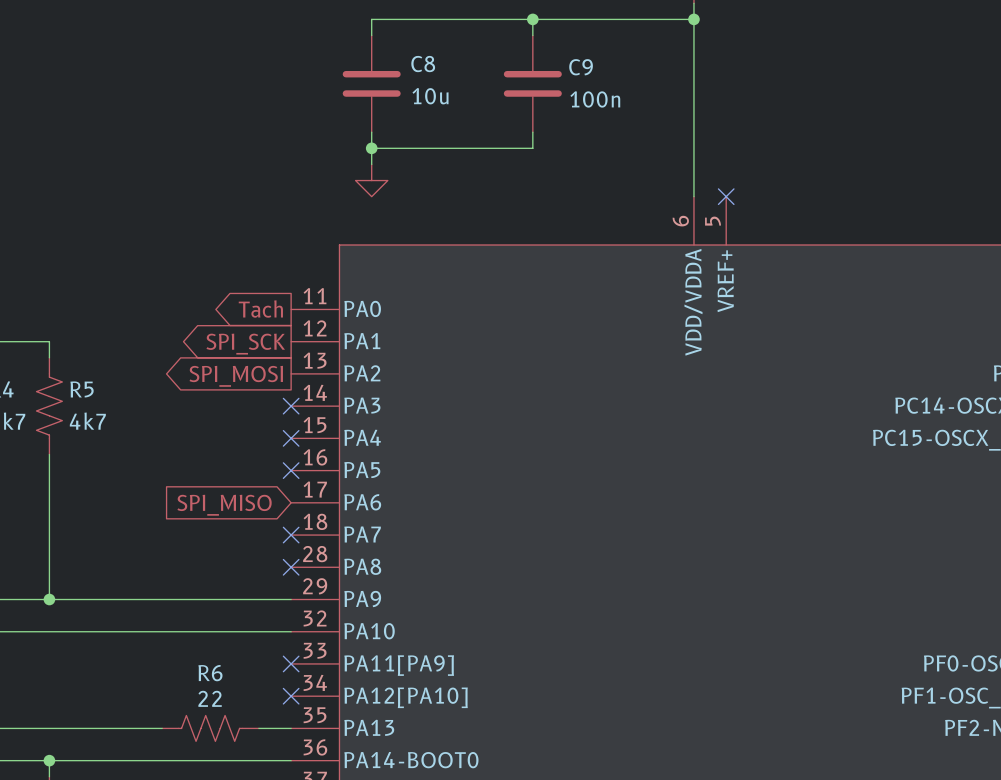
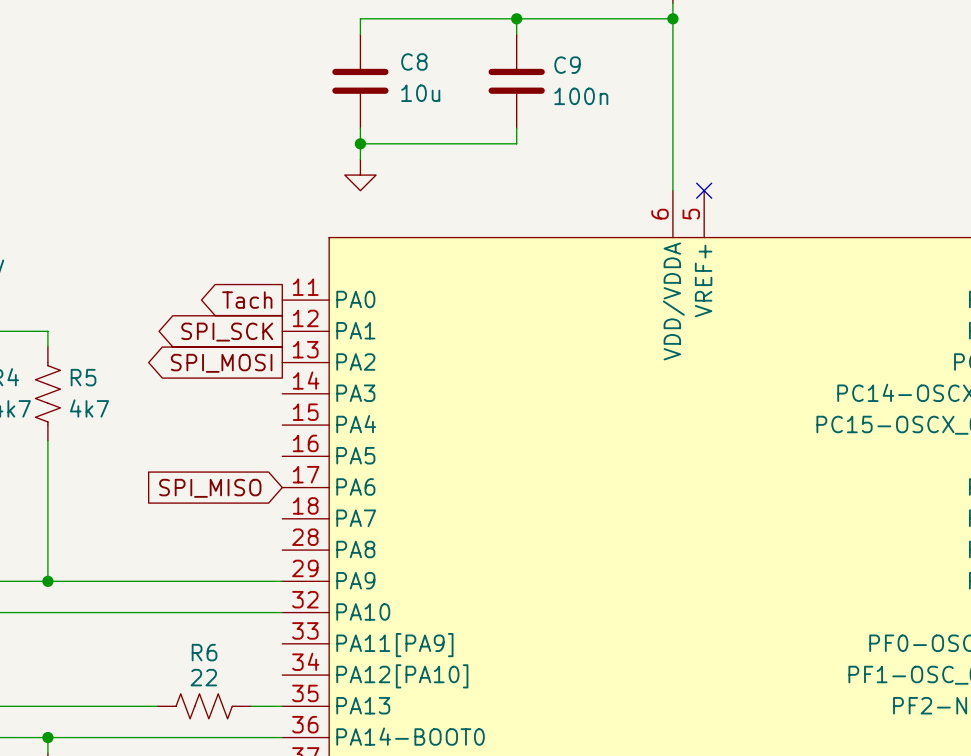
no-connect mark: (291, 406) -> none
no-connect mark: (291, 438) -> none
no-connect mark: (291, 470) -> none
no-connect mark: (291, 535) -> none
no-connect mark: (291, 567) -> none
no-connect mark: (291, 663) -> none
no-connect mark: (291, 696) -> none

